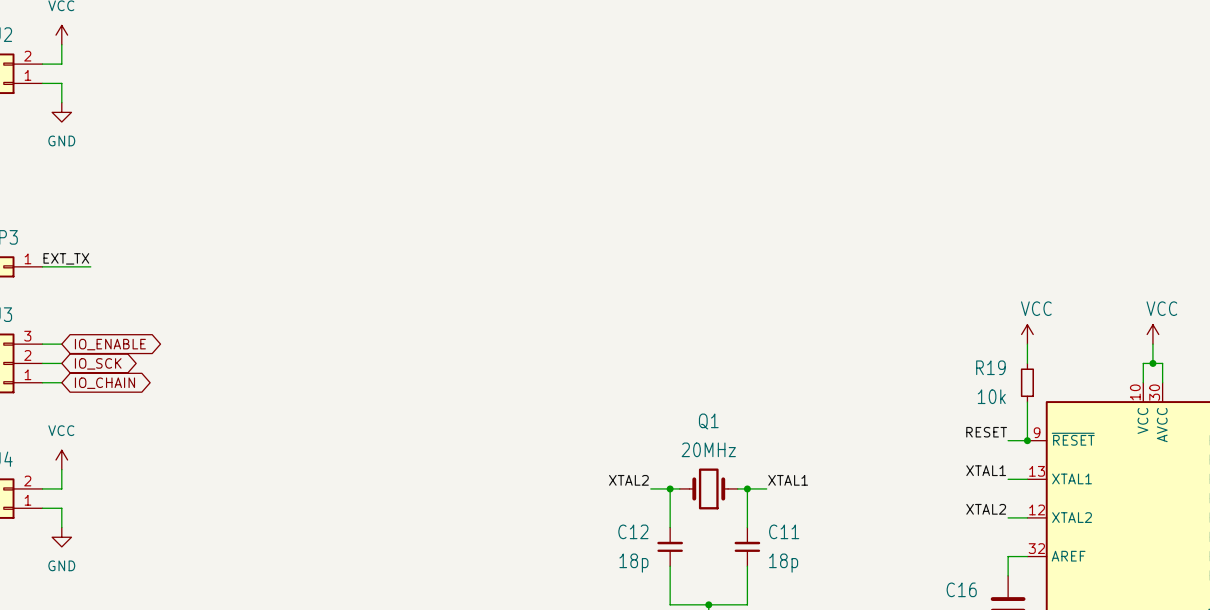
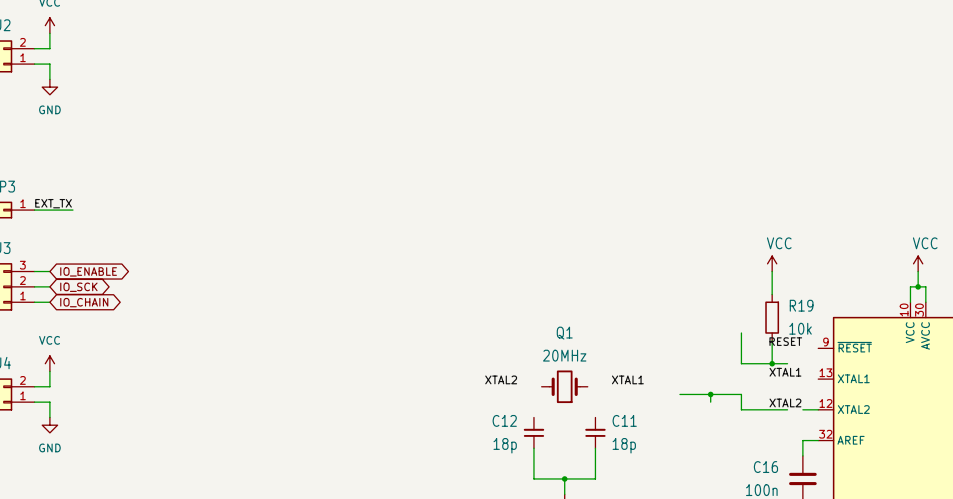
power symbol position: VCC (1027, 334) -> VCC (772, 263)
wire: none -> (772, 271) (772, 294)
wire: (1027, 344) (1027, 363) -> none
R19 symbol: [1020, 363, 1034, 403] -> [765, 294, 780, 341]
R19 name position: R19 (990, 367) -> R19 (801, 305)
R19 value position: 10k (991, 396) -> 10k (800, 328)
wire: (1027, 402) (1027, 440) (1008, 440) -> none
wire: none -> (741, 332) (741, 363) (787, 363)
wire: none -> (772, 340) (772, 363)
junction: (1027, 440) -> none
junction: none -> (772, 363)
wire: (1008, 479) (1027, 479) -> none
wire: (650, 488) (679, 488) -> none
wire: (670, 488) (670, 527) -> none
junction: (670, 488) -> none
wire: (737, 488) (766, 488) -> none
wire: (747, 488) (747, 527) -> none
junction: (747, 488) -> none
wire: none -> (679, 394) (741, 394) (741, 409) (787, 409)
wire: none -> (710, 394) (710, 402)
junction: none -> (710, 394)

